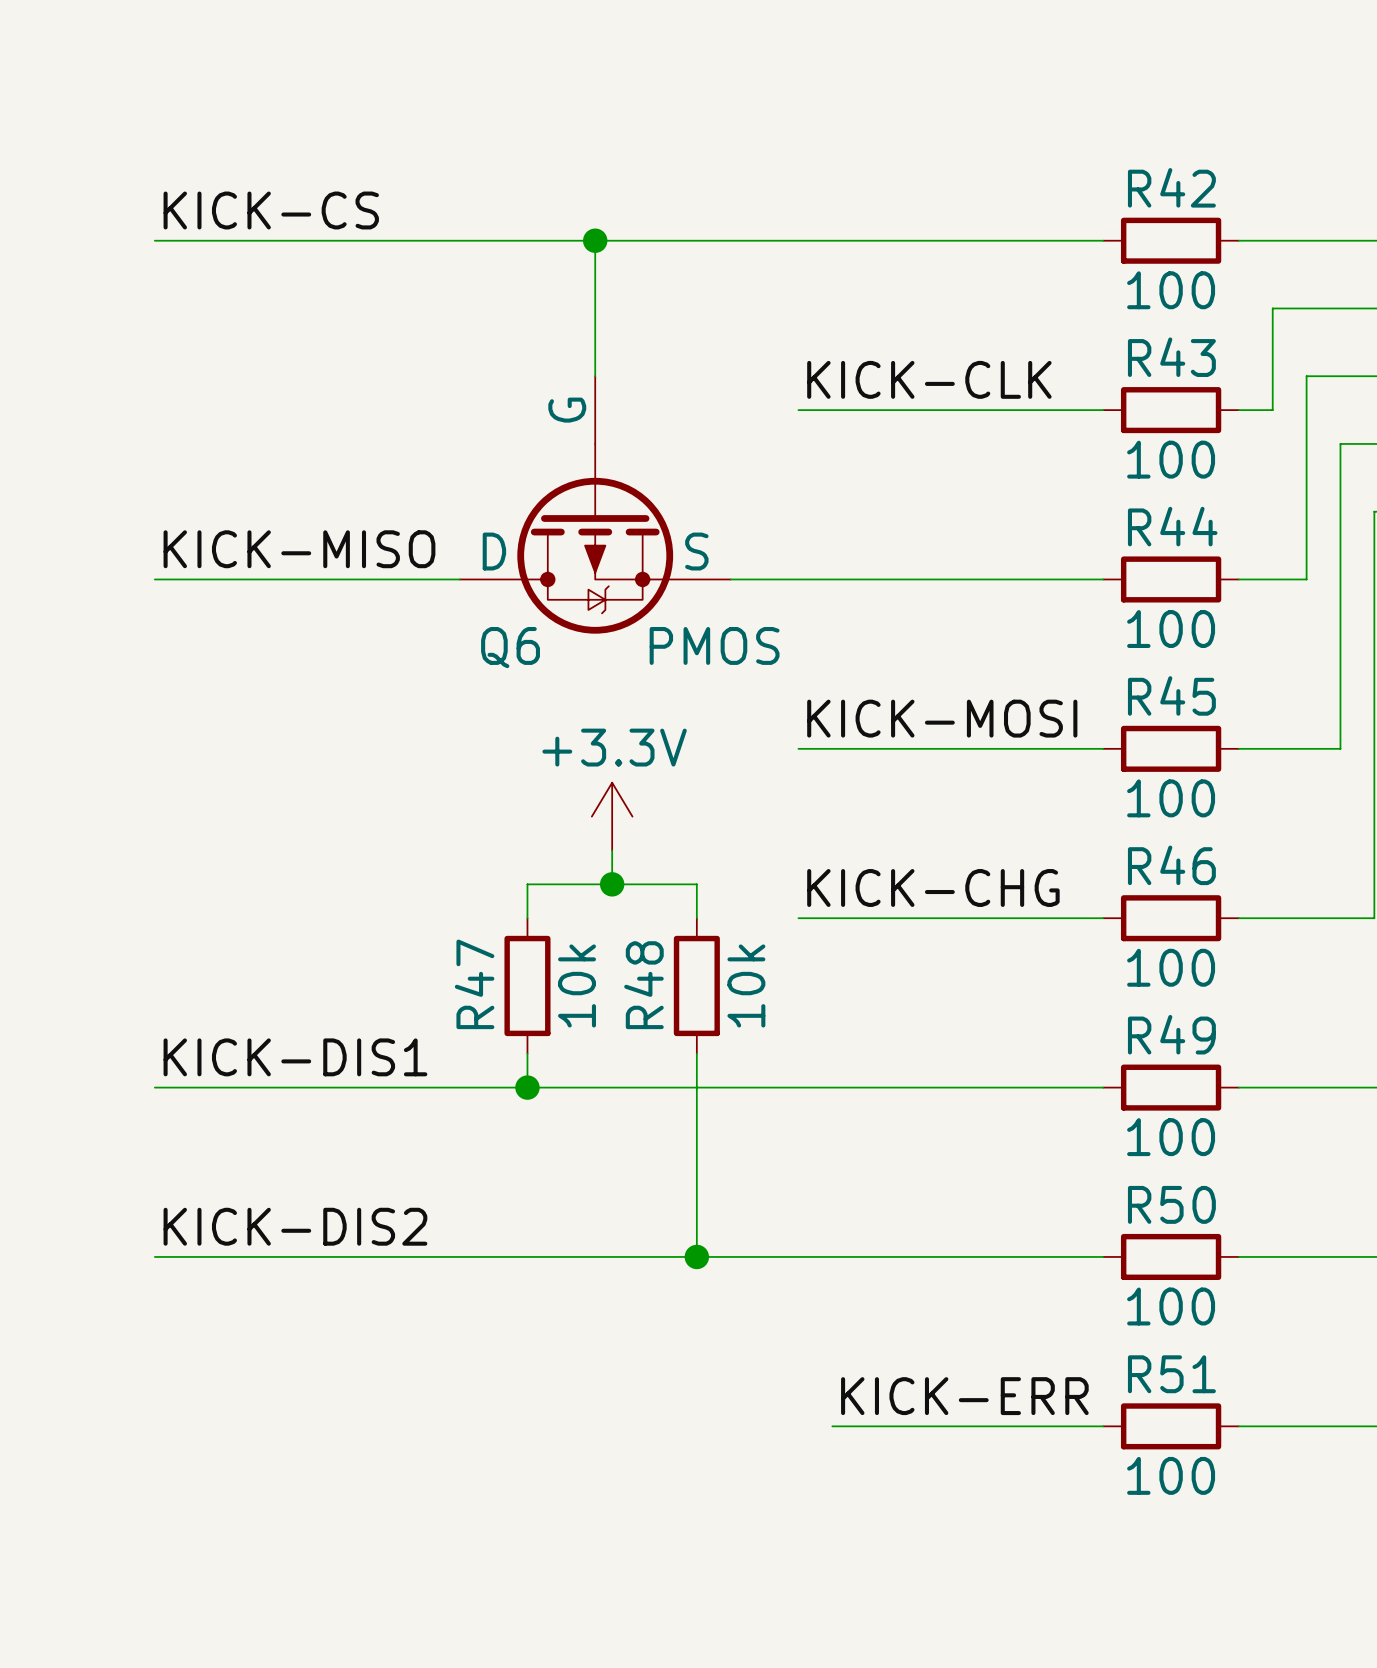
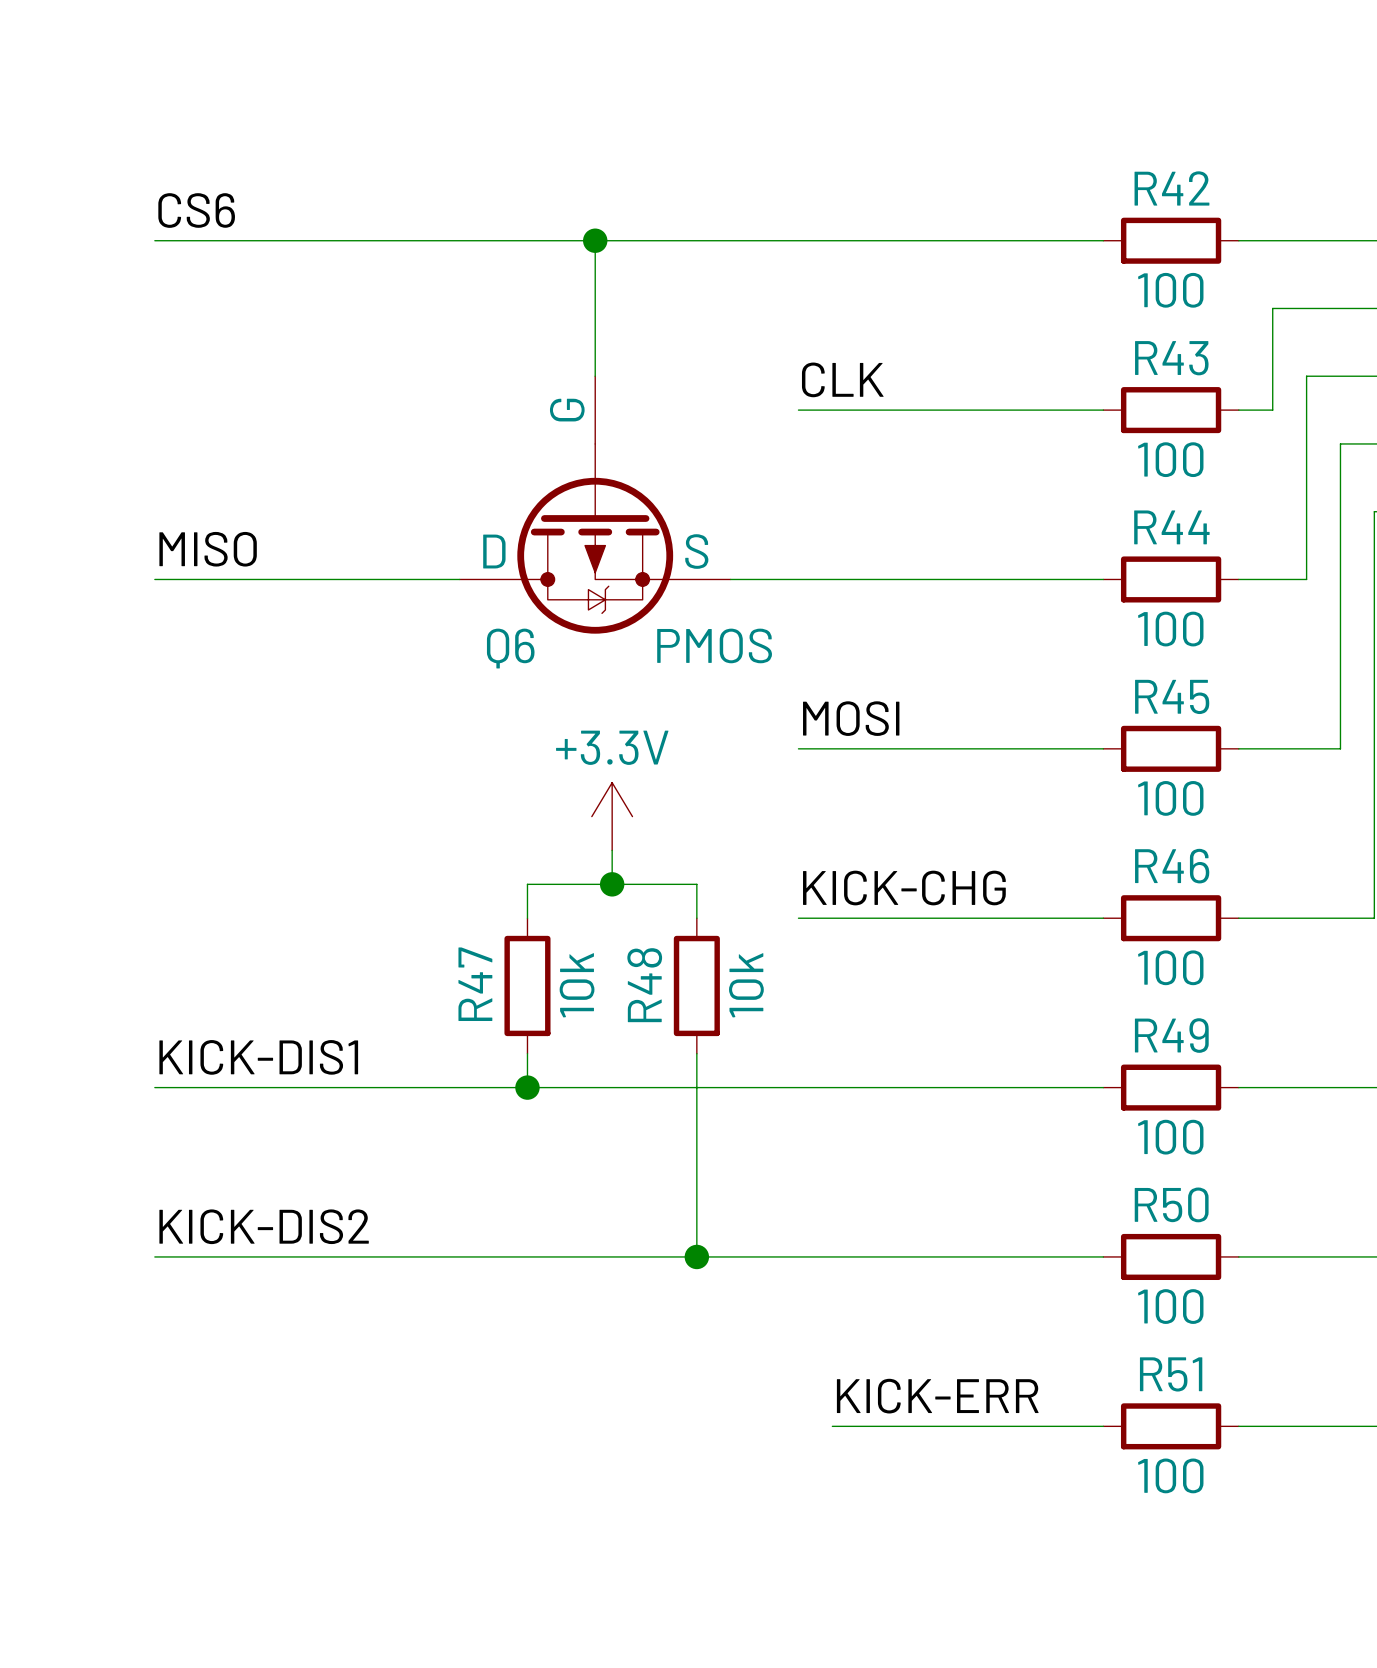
label: KICK-CS (271, 210) -> CS6 (196, 210)
label: KICK-CLK (929, 379) -> CLK (842, 379)
label: KICK-MISO (299, 549) -> MISO (208, 549)
label: KICK-MOSI (942, 718) -> MOSI (851, 718)

